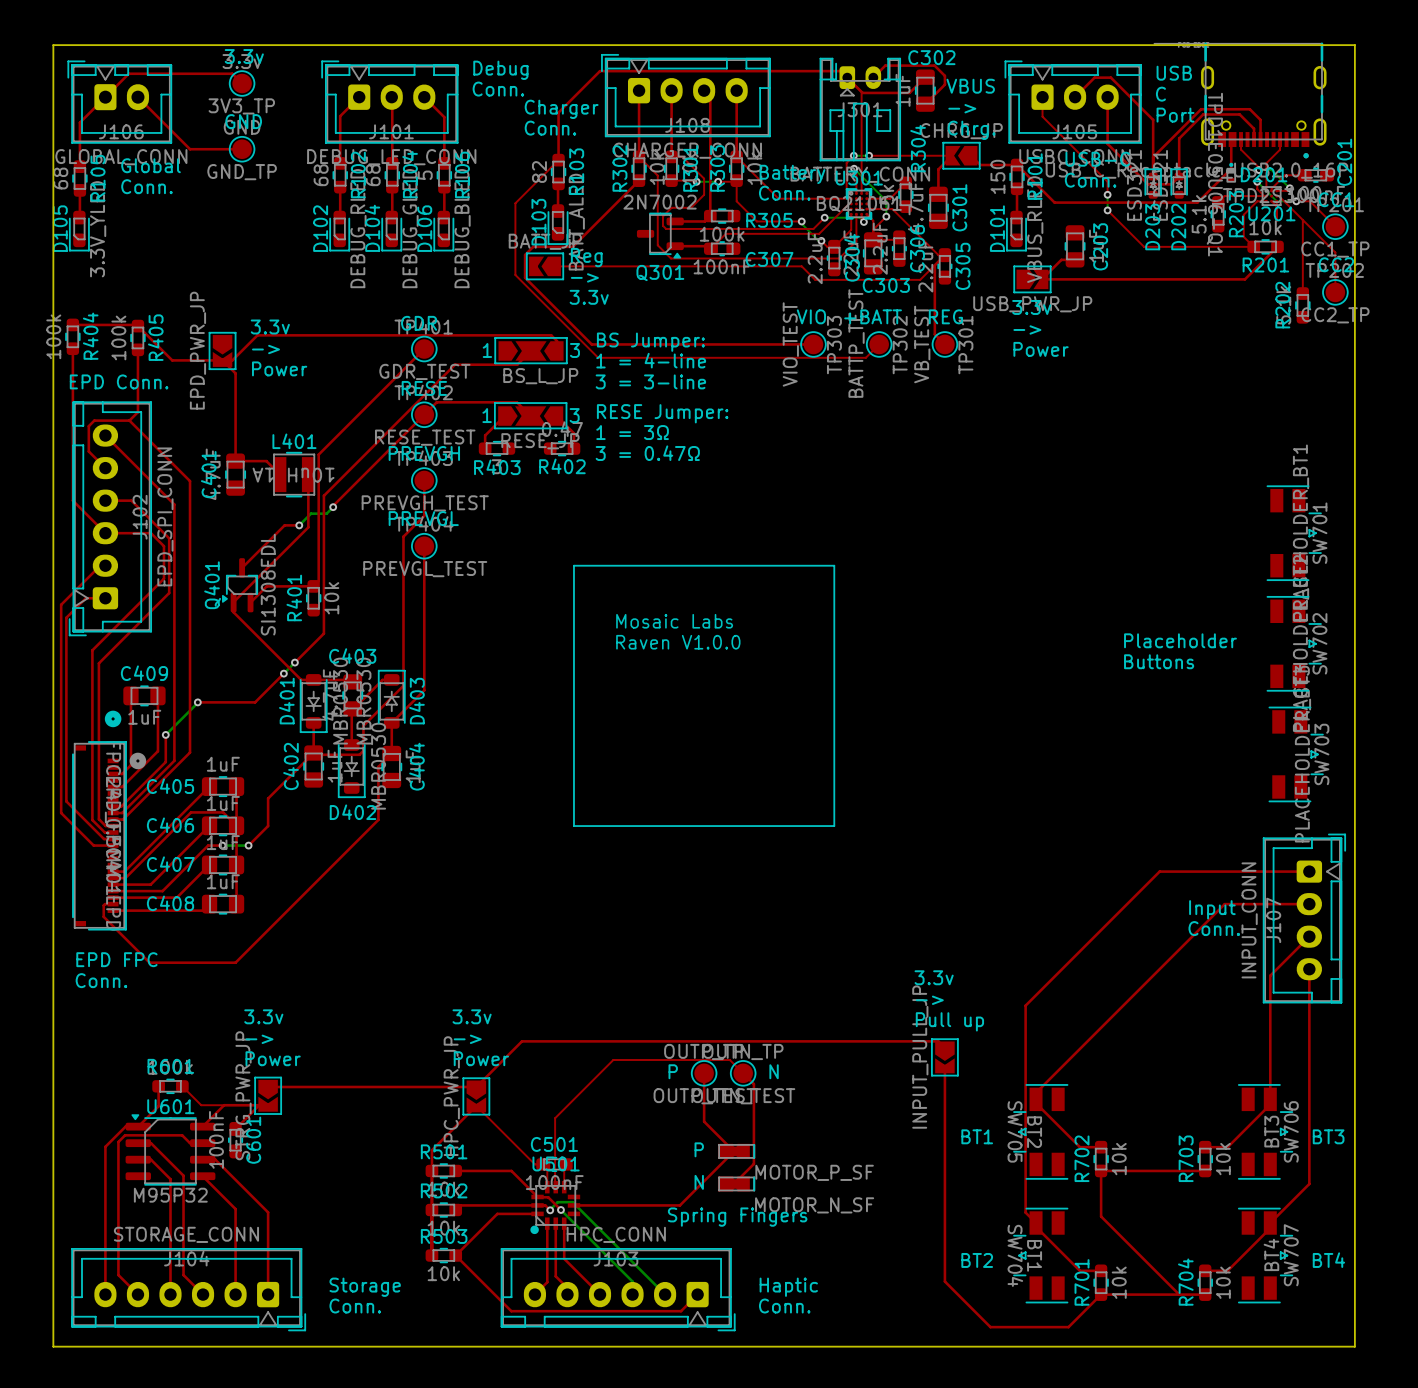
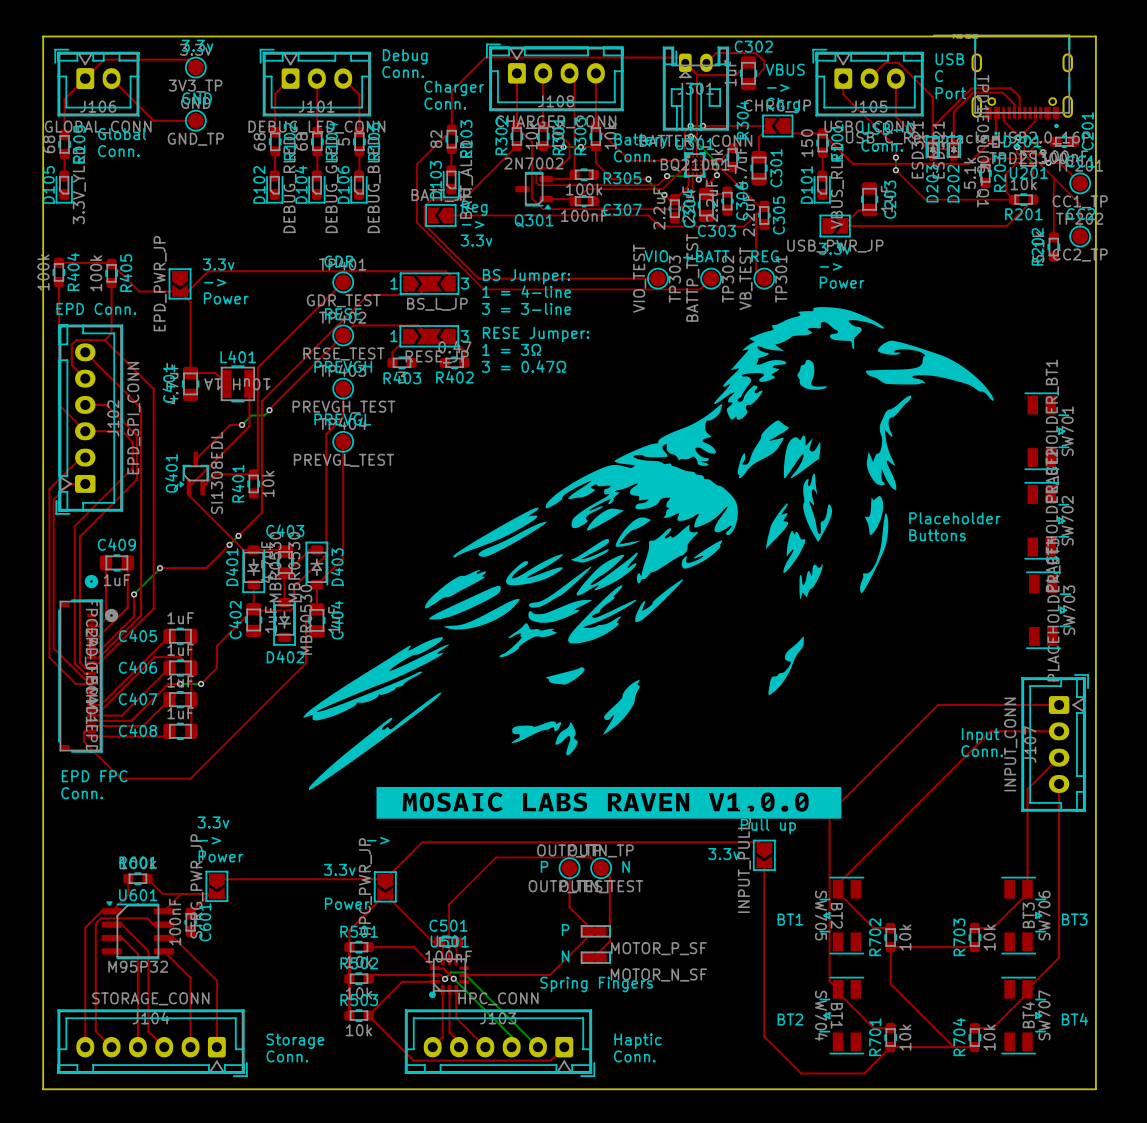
drawing: none -> [303, 307, 994, 819]
line: (573, 565) (834, 565) (834, 826) (573, 826) (573, 565) -> none
text: Mosaic Labs (674, 621) -> none
text: Raven V1.0.0 (678, 642) -> none
text position: 3.3v (934, 977) -> 3.3v (723, 854)
text position: 3.3v (472, 1016) -> 3.3v (339, 869)
text position: Power (481, 1058) -> Power (347, 903)

